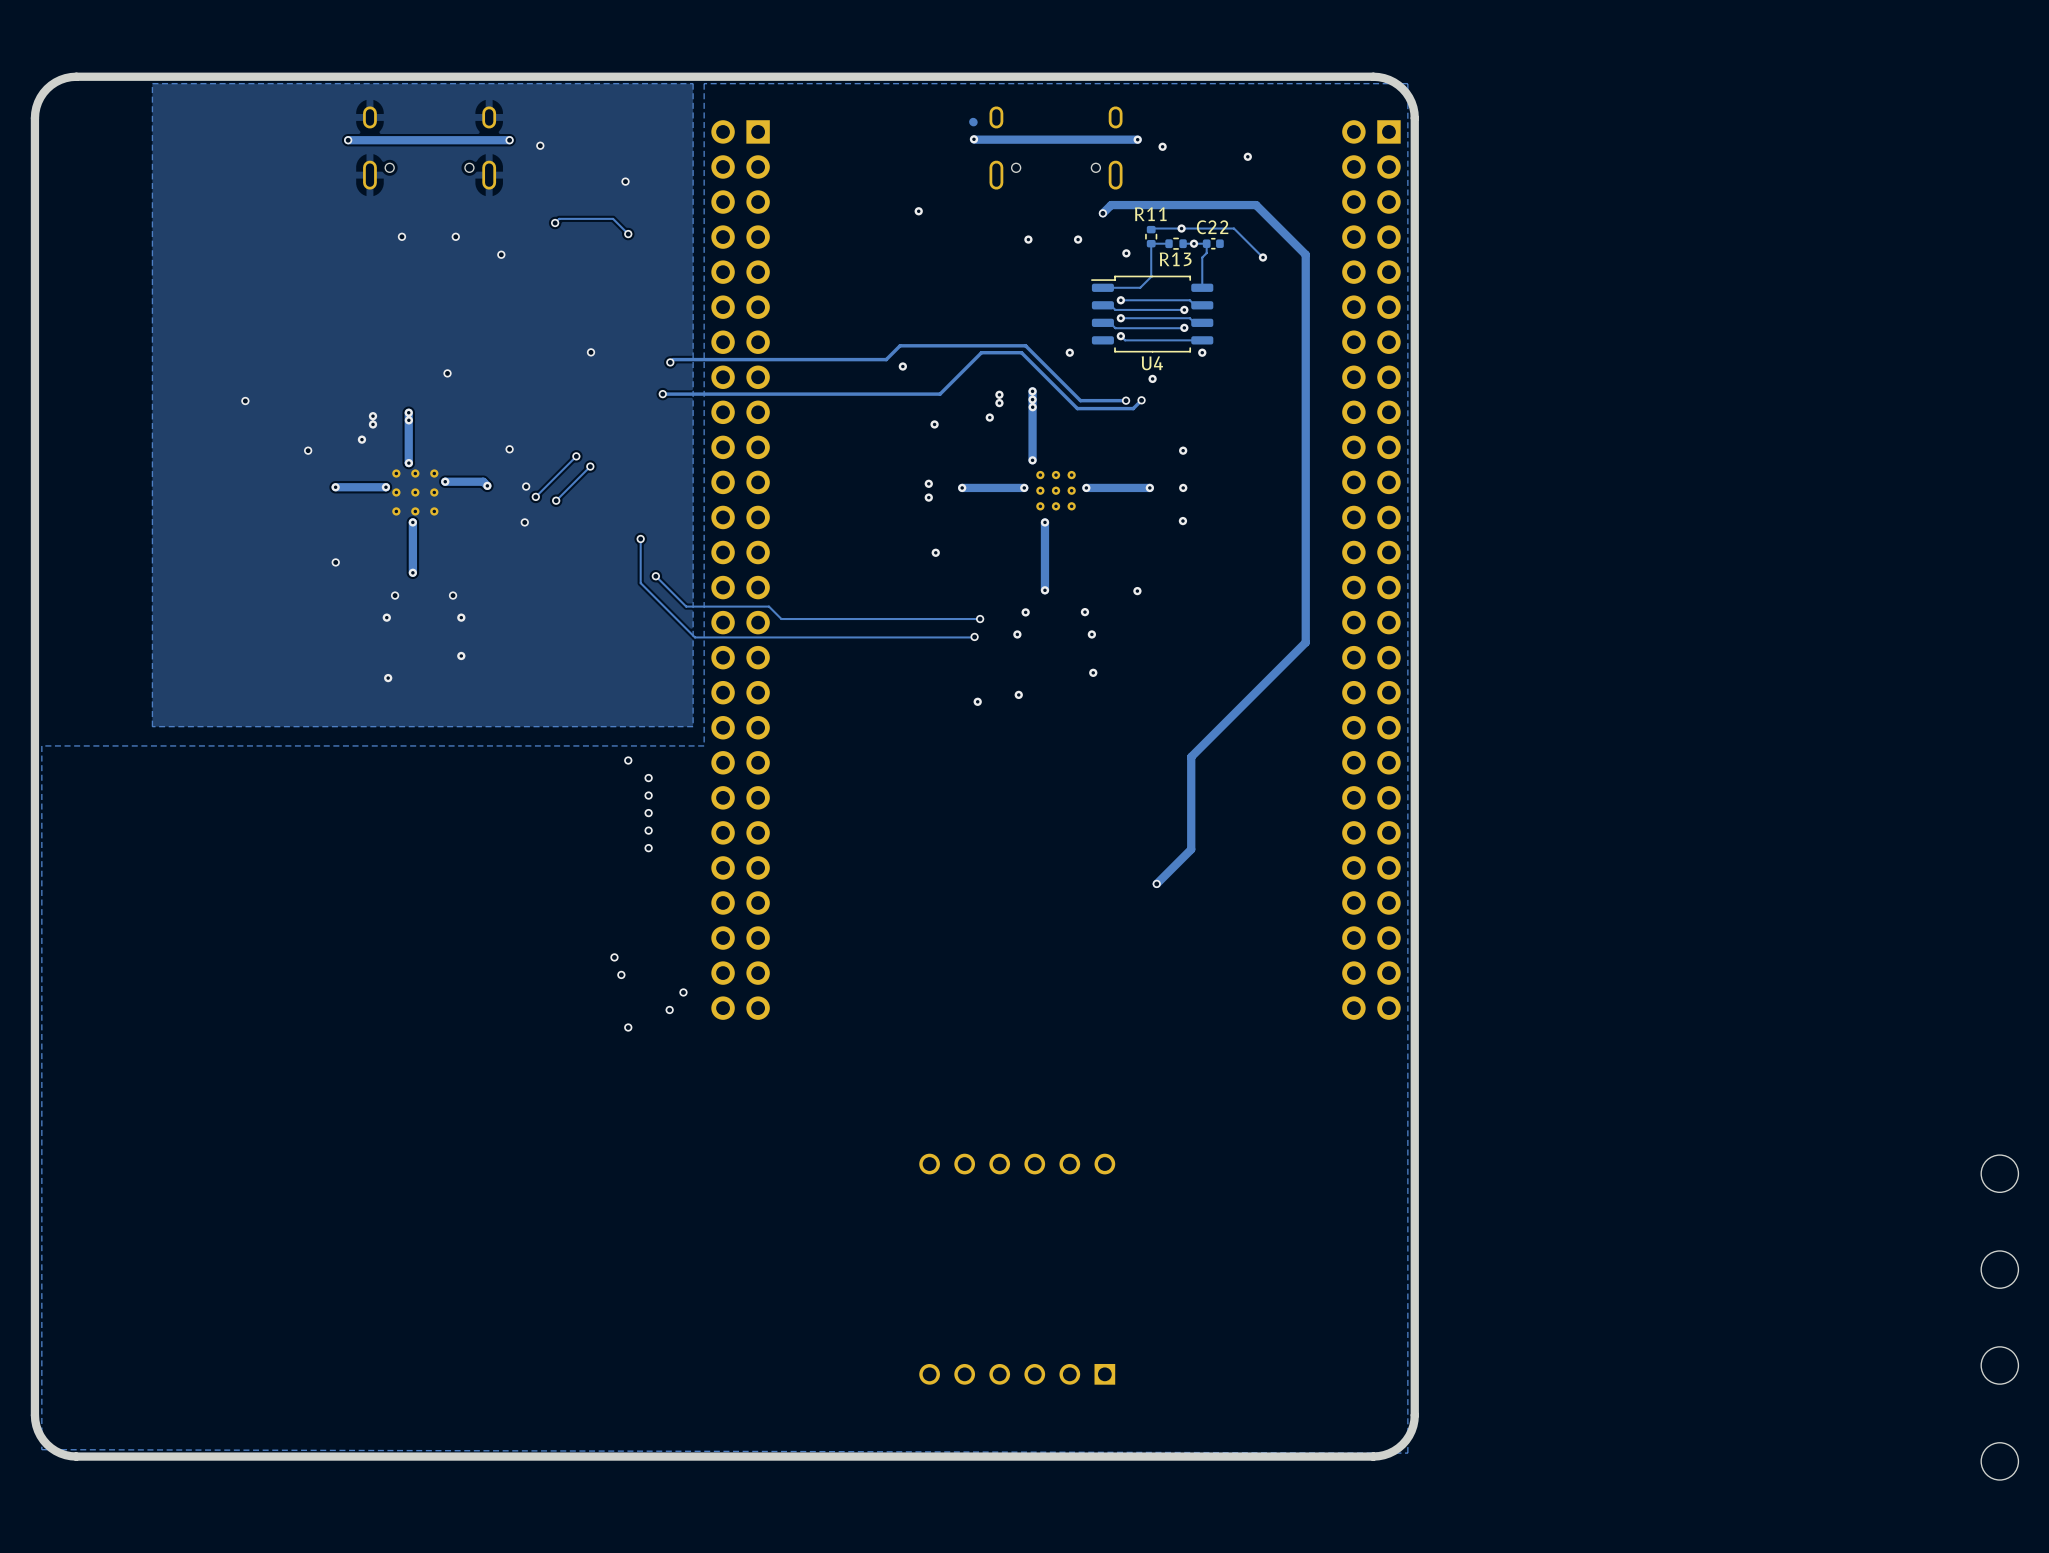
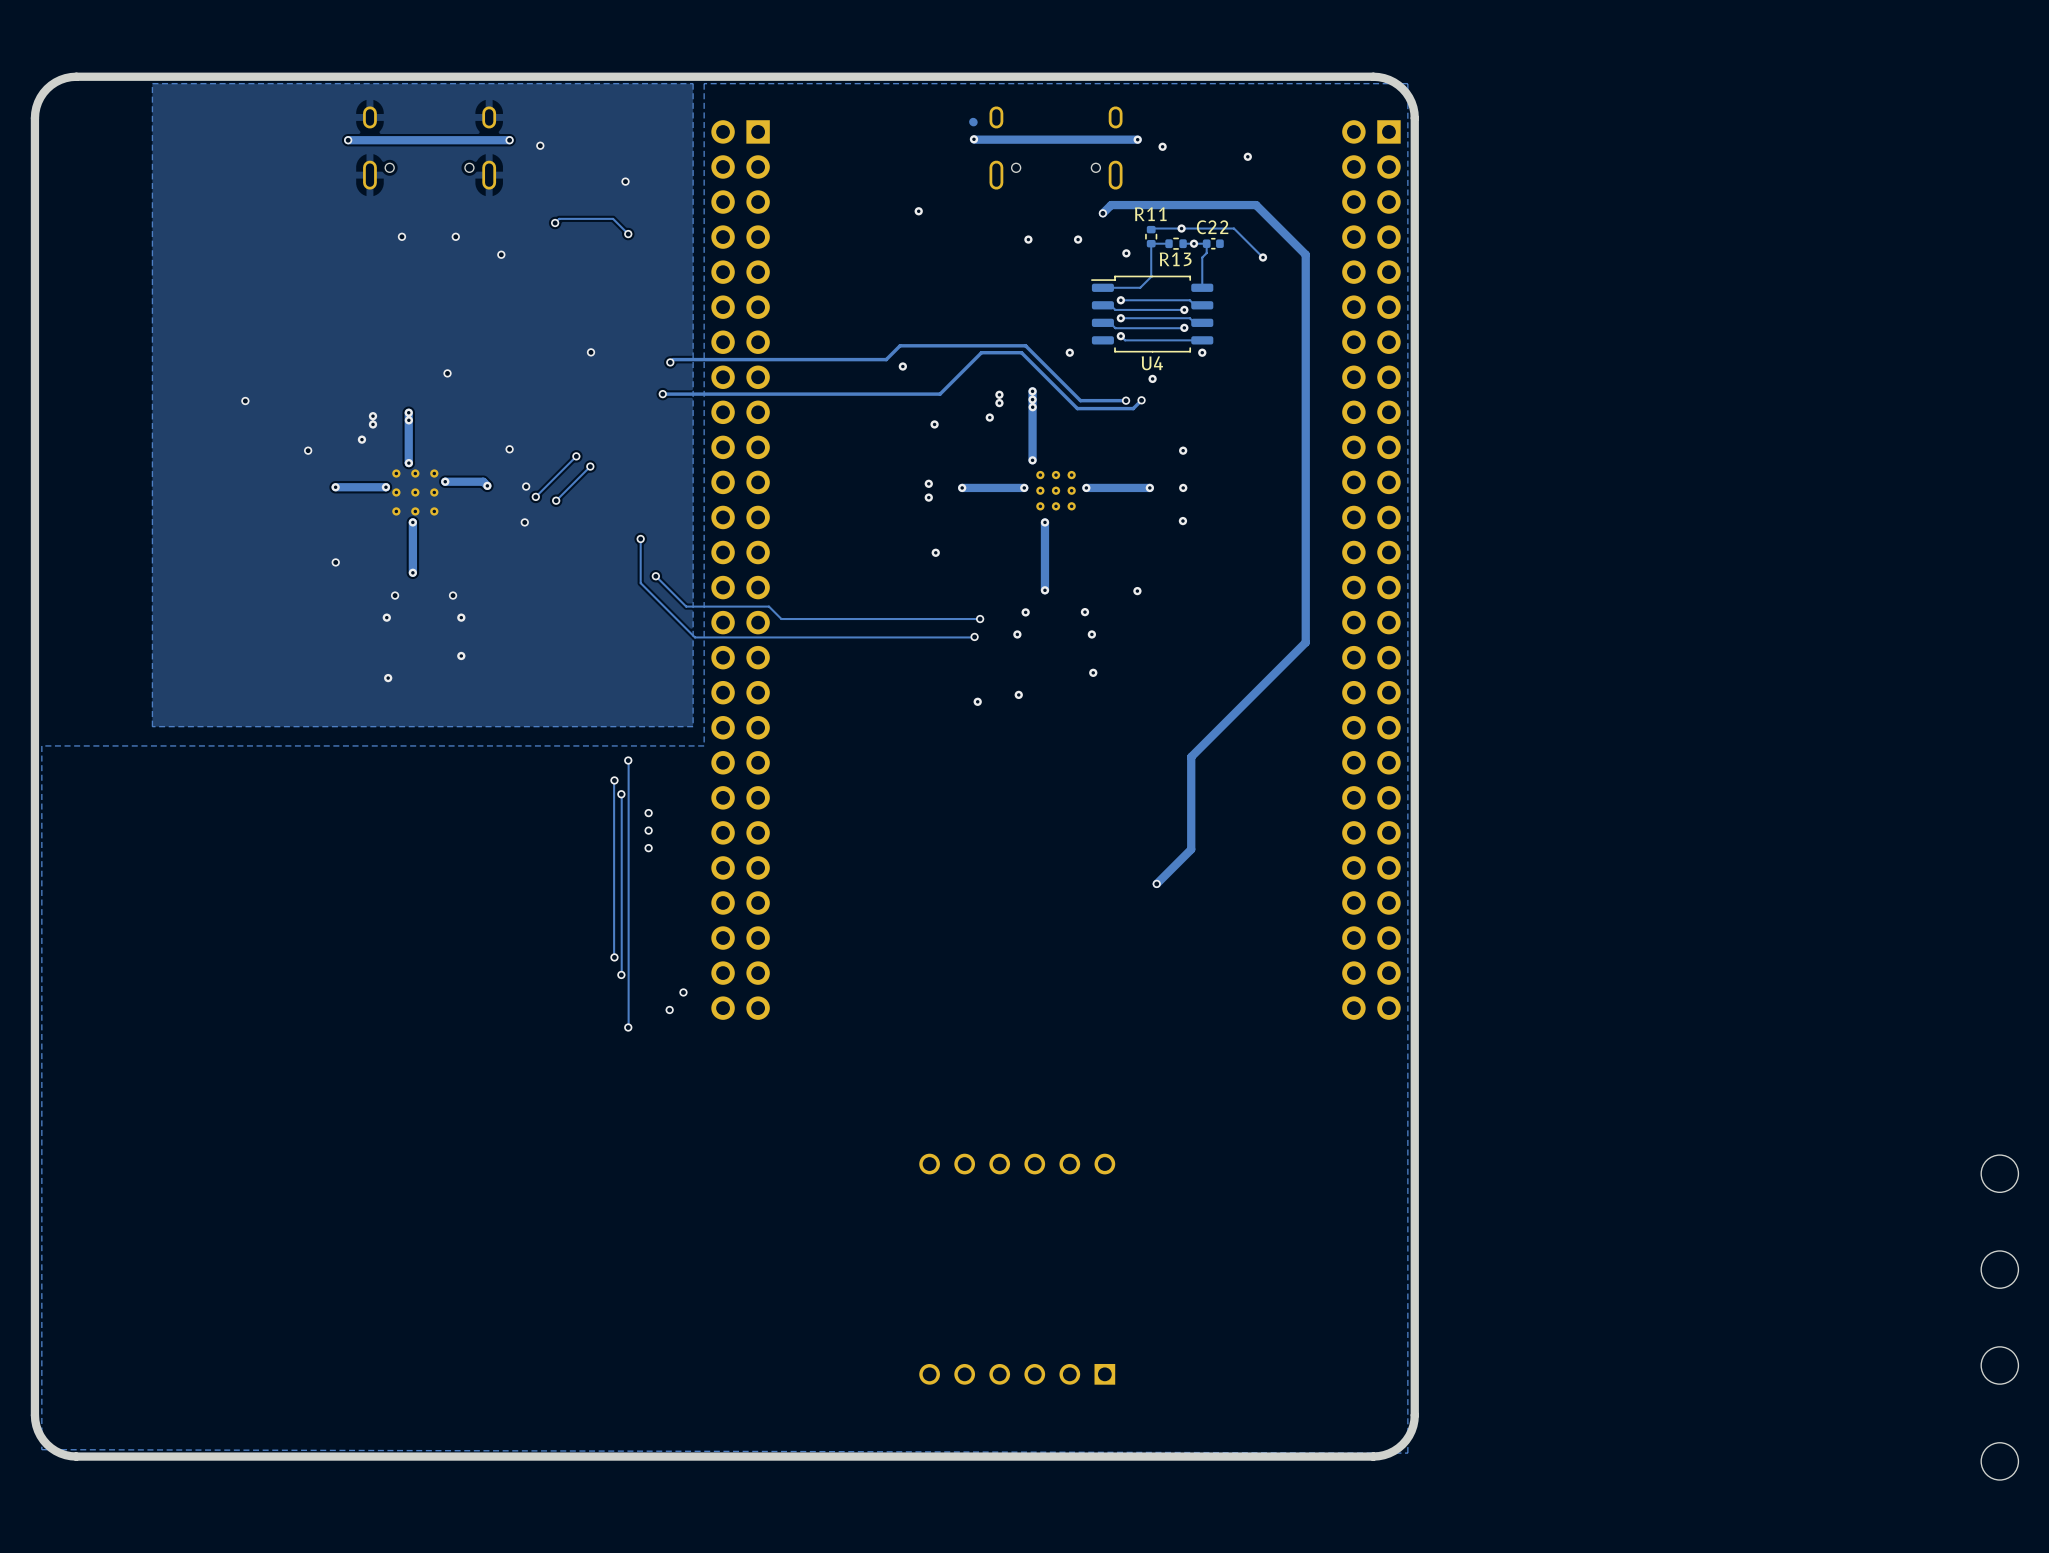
track: none -> (628, 760) (628, 1027)
via: (648, 778) -> none
track: none -> (614, 780) (614, 957)
via: none -> (614, 780)
track: none -> (621, 794) (621, 974)
via: none -> (621, 794)
via: (648, 795) -> none

